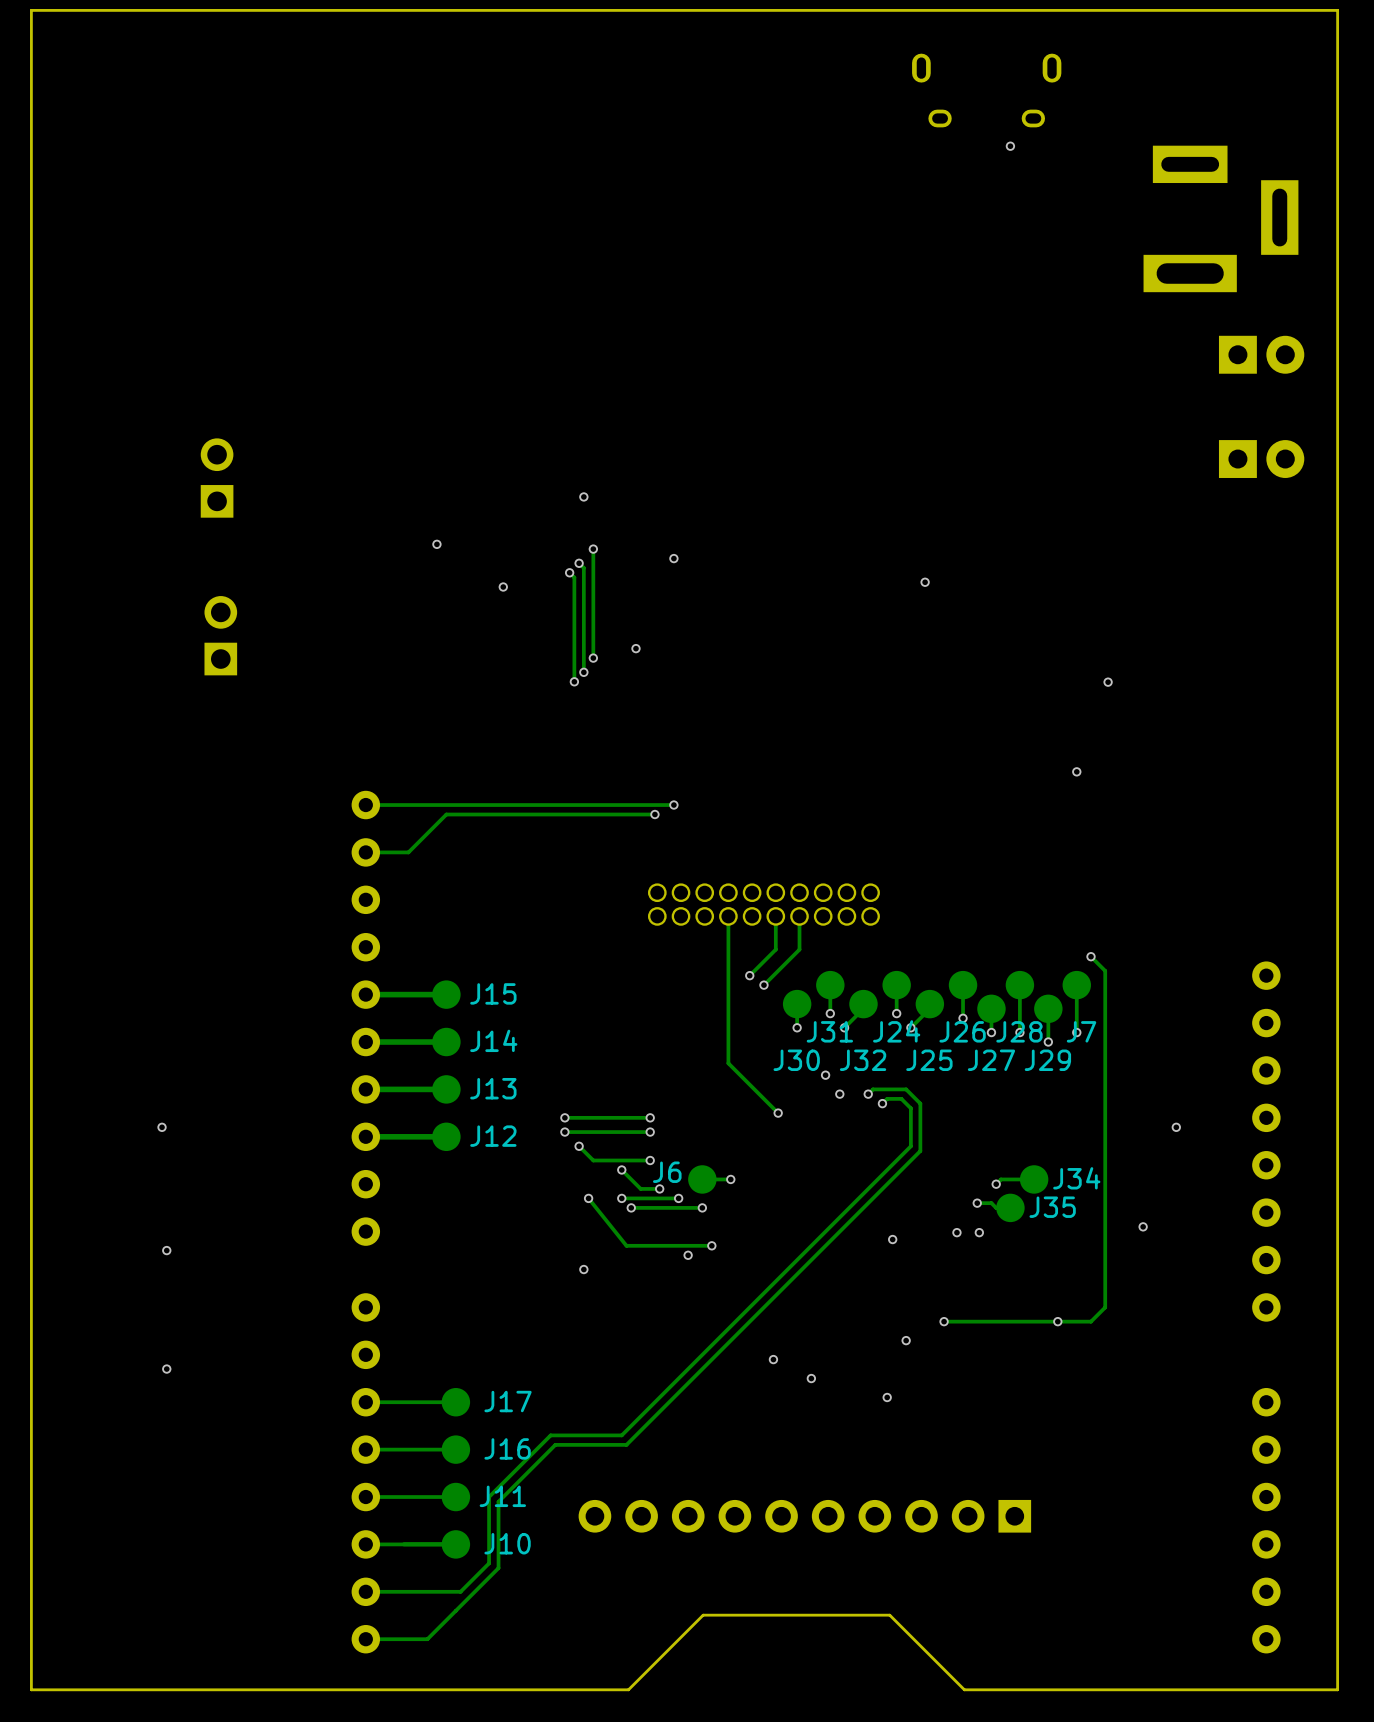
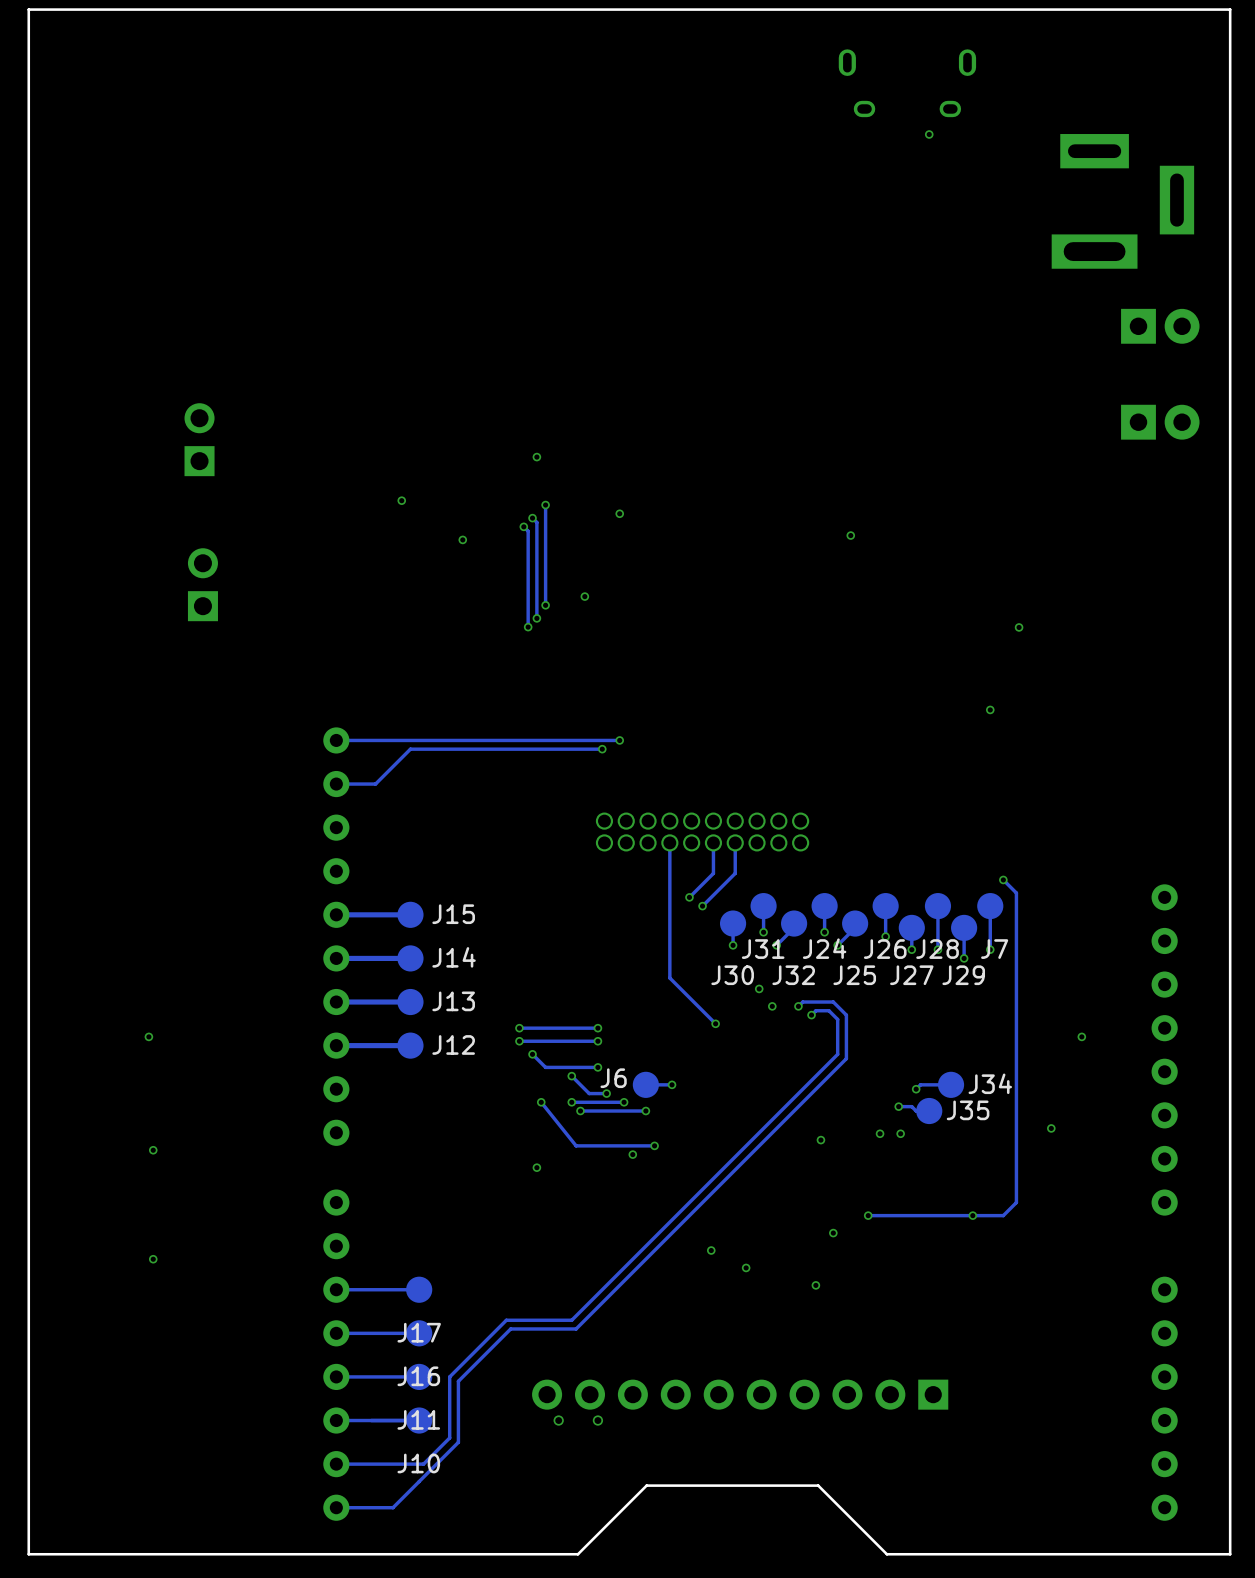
J17 name position: J17 (508, 1401) -> J17 (419, 1332)
J16 name position: J16 (507, 1448) -> J16 (418, 1376)
J11 name position: J11 (502, 1496) -> J11 (418, 1419)
J10 name position: J10 (507, 1543) -> J10 (418, 1463)
via: none -> (558, 1420)
via: none -> (597, 1420)

